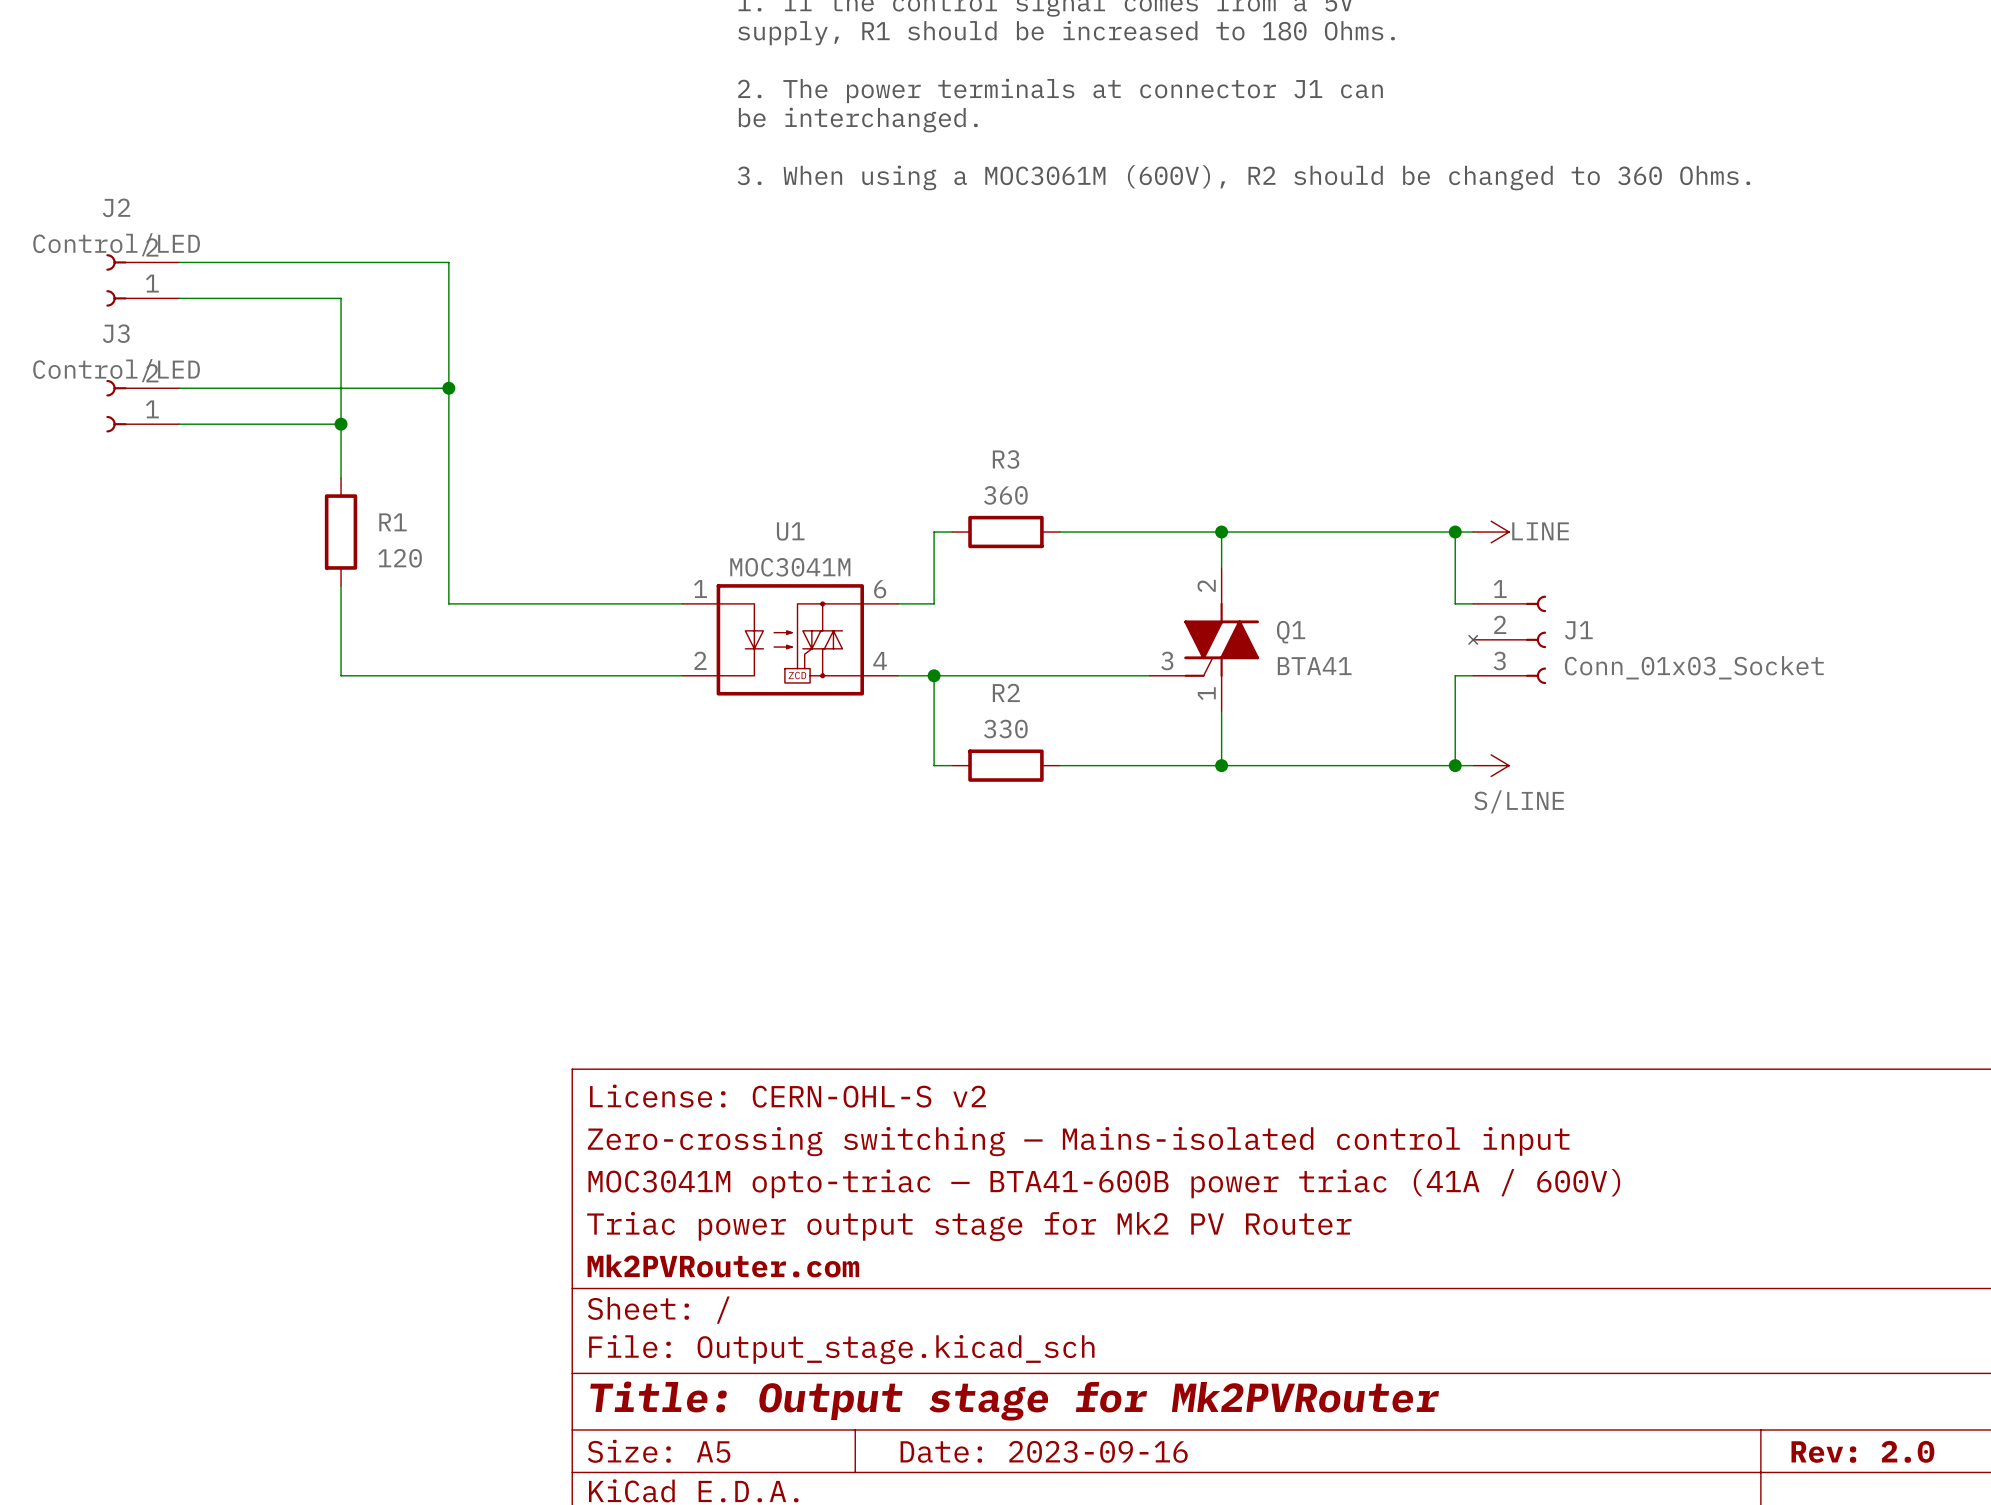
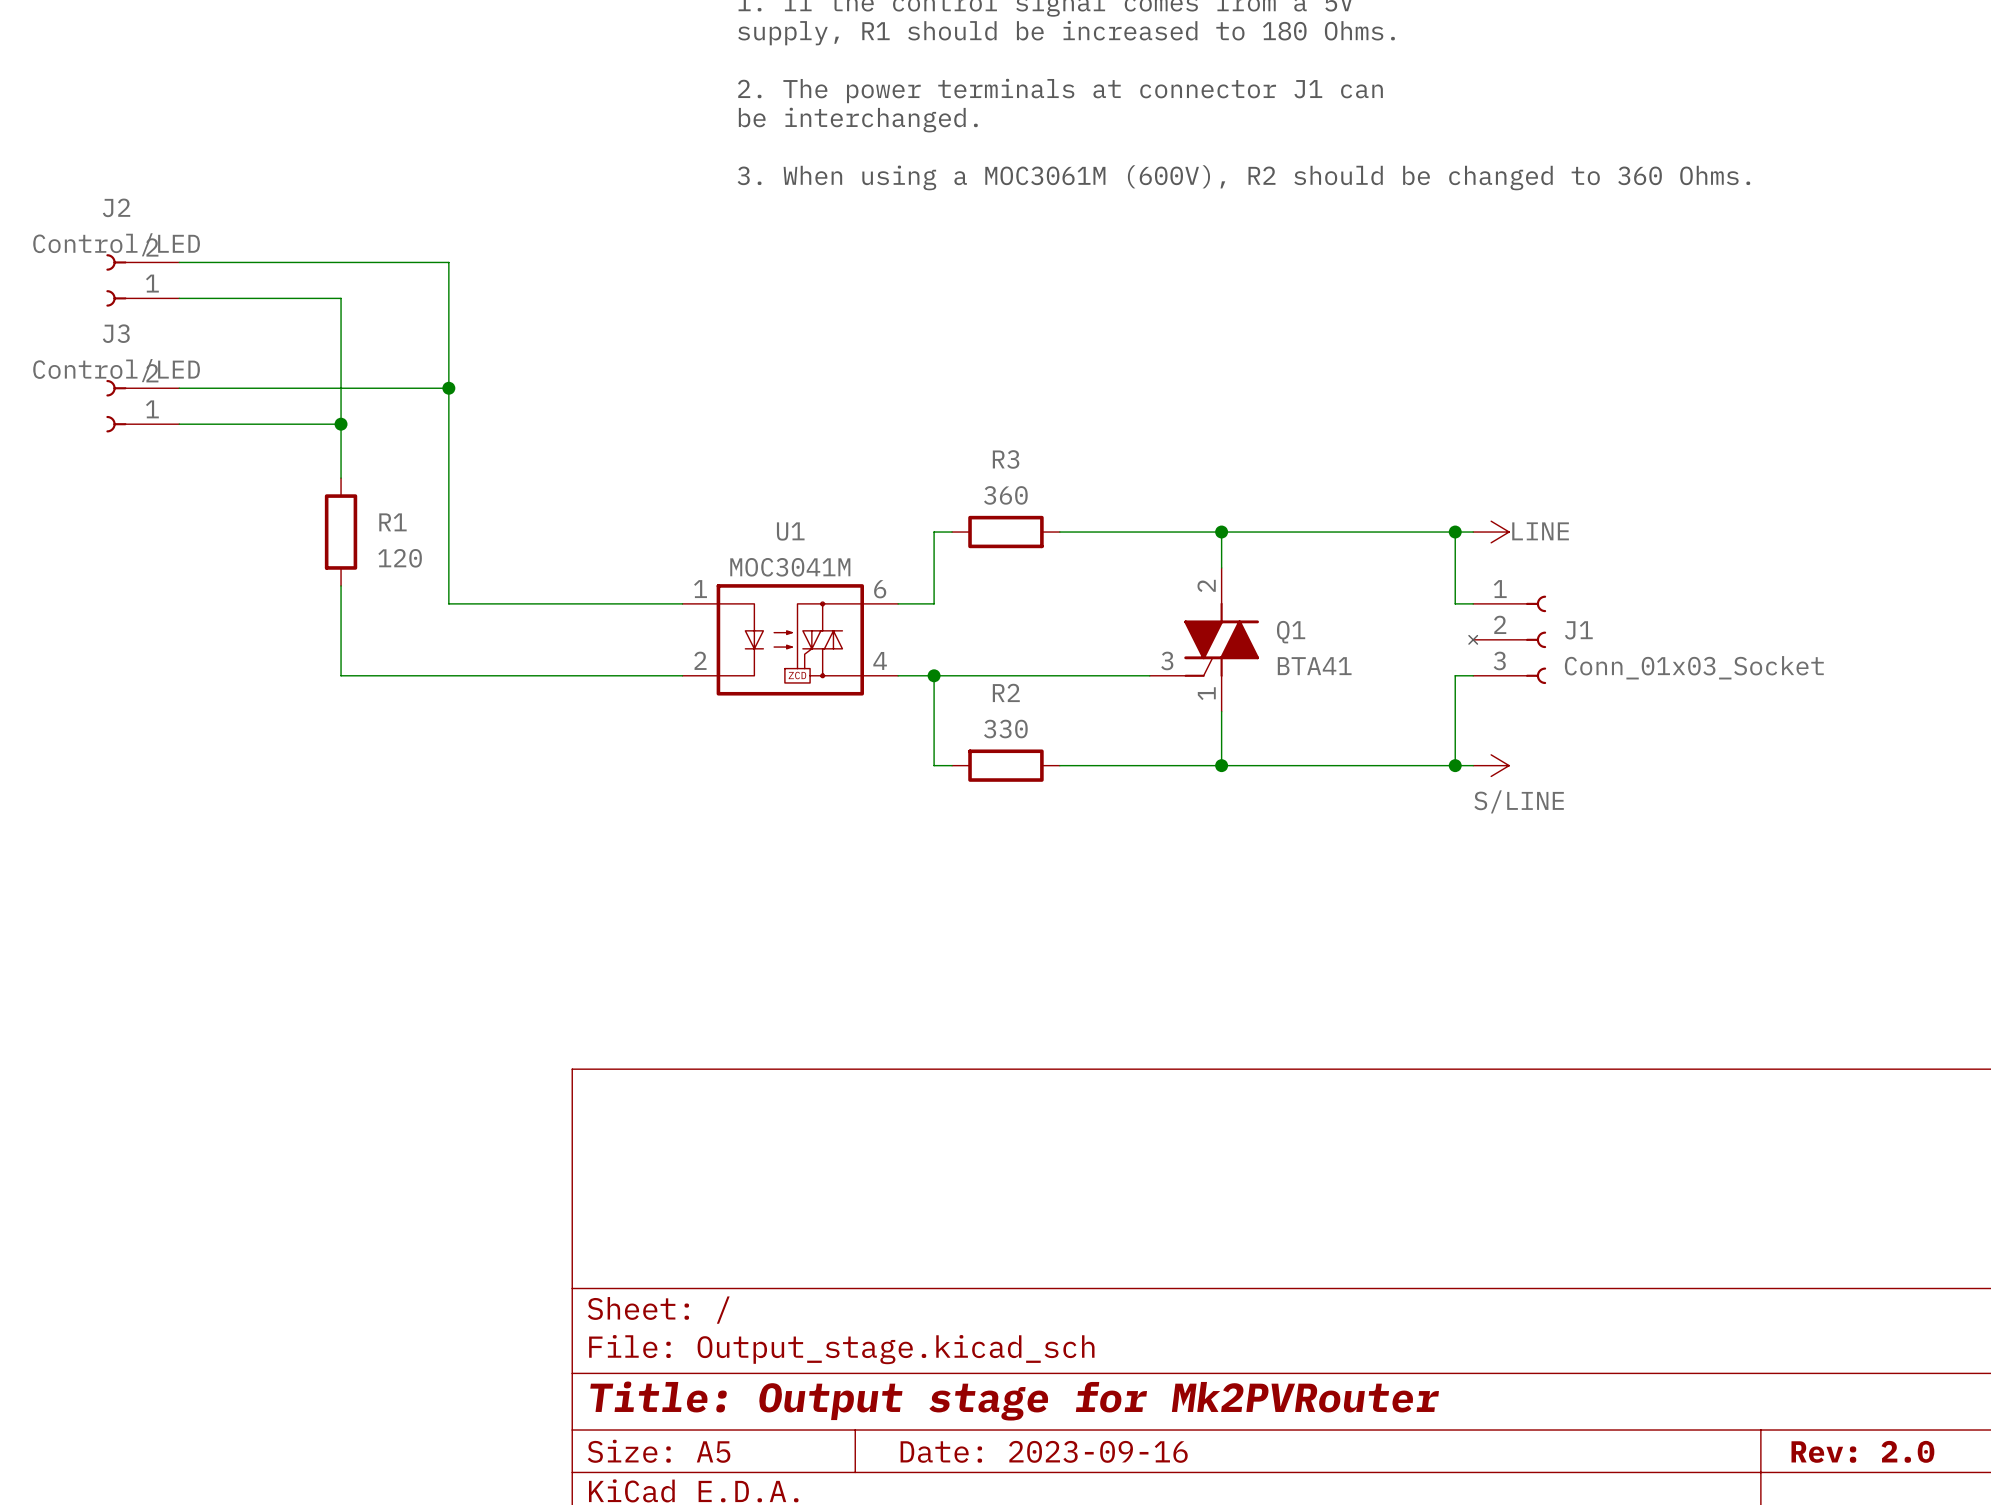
title block: License: CERN-OHL-S v2 (787, 1096) -> none
title block: Zero-crossing switching — Mains-isolated control input (1078, 1141) -> none
title block: MOC3041M opto-triac — BTA41-600B power triac (41A / 600V) (1104, 1183) -> none
title block: Triac power output stage for Mk2 PV Router (969, 1226) -> none
title block: Mk2PVRouter.com (723, 1266) -> none

